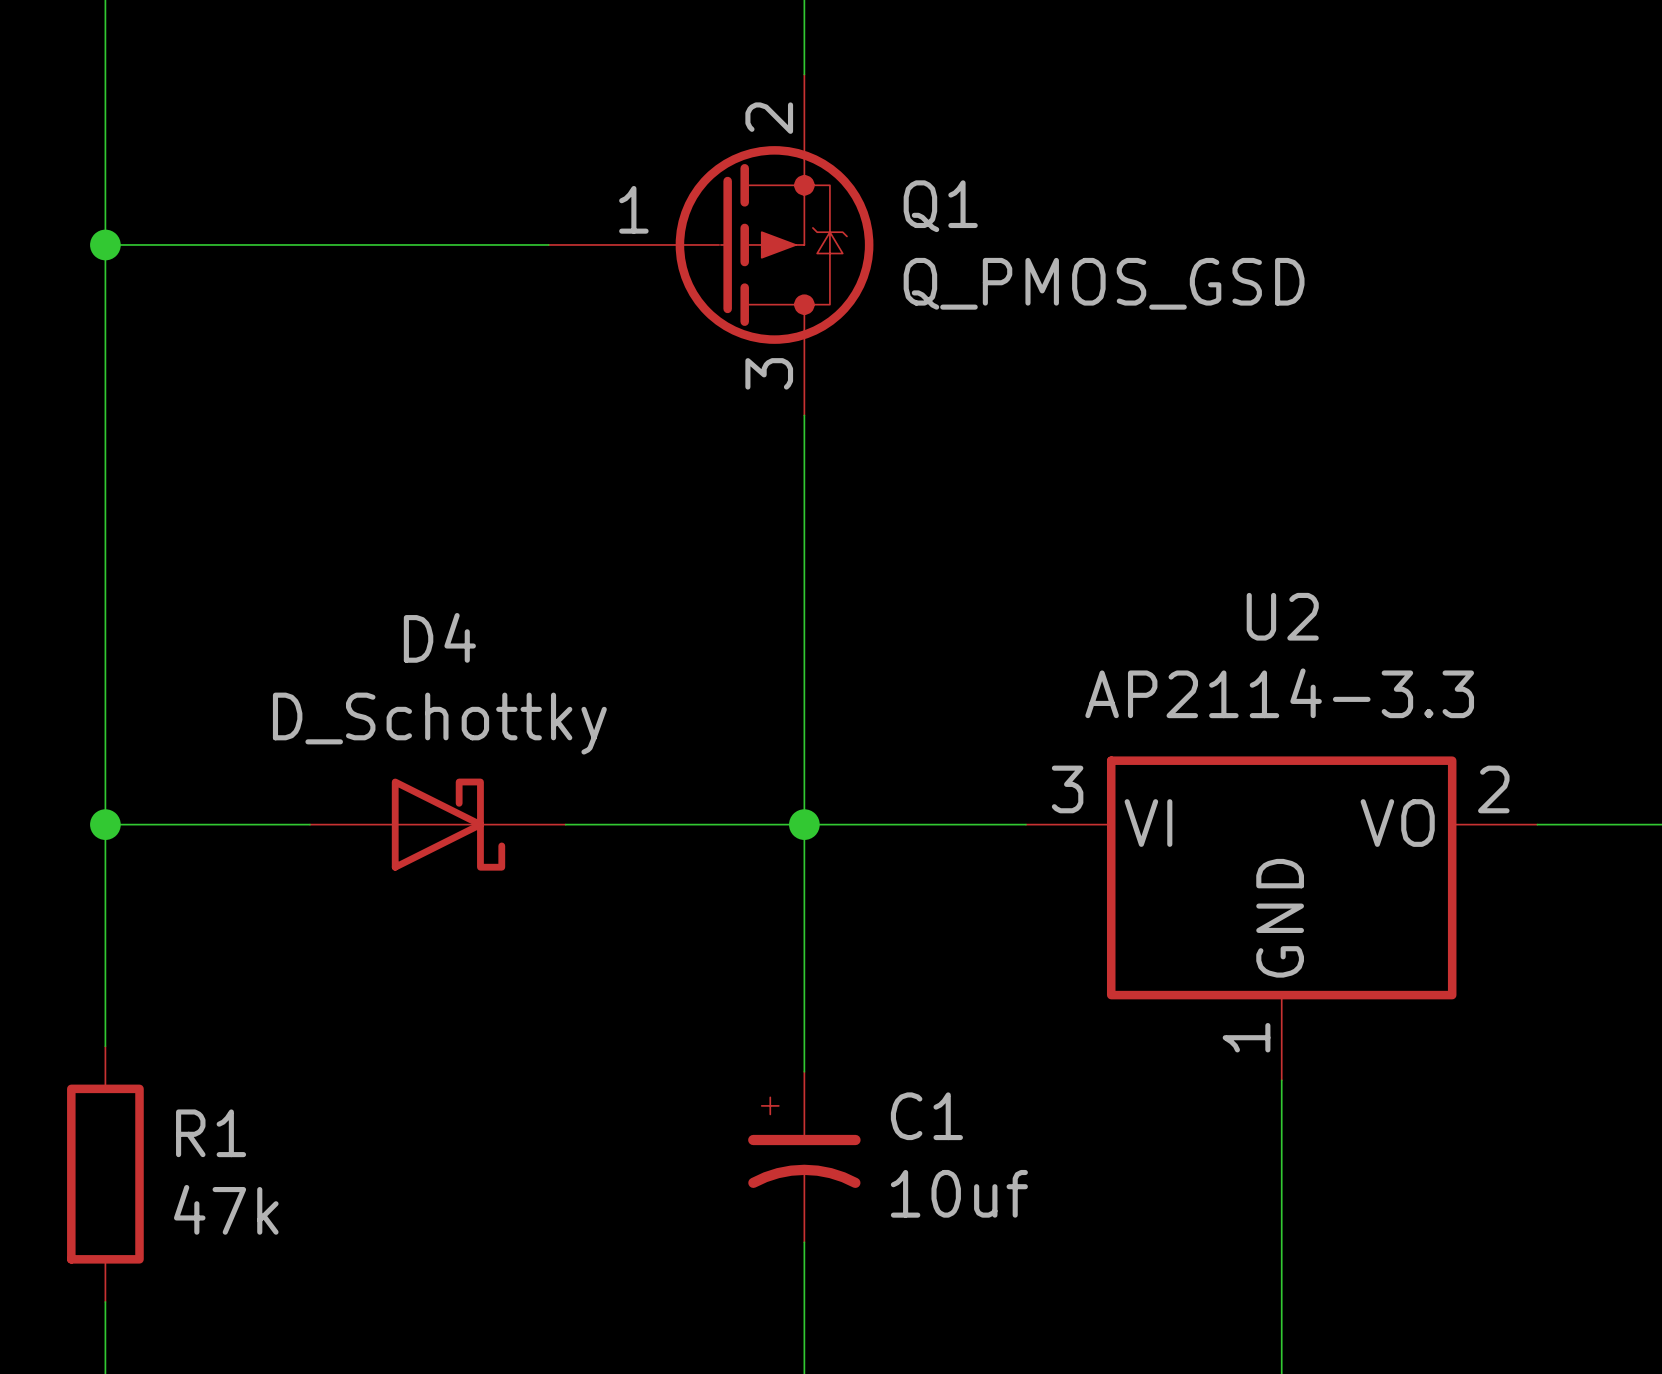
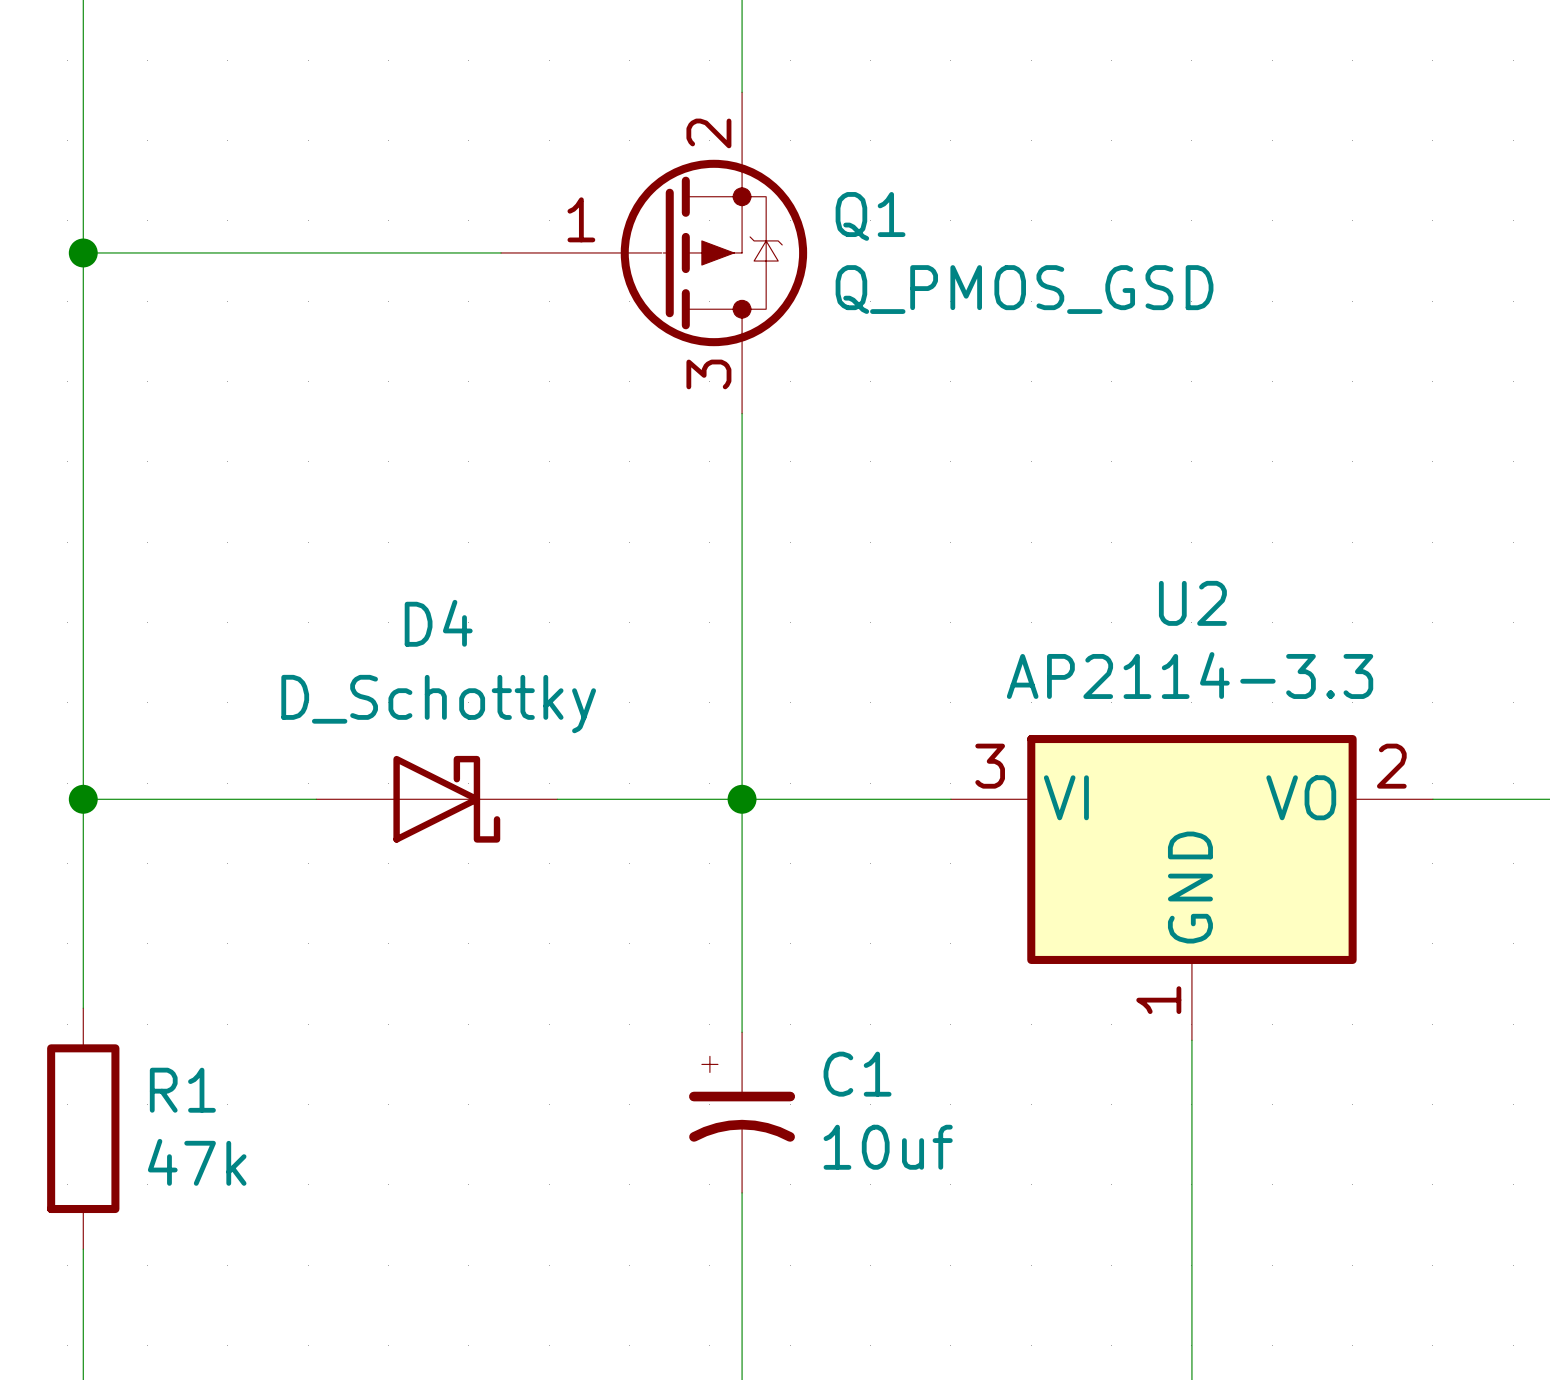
D4 position: (437, 824) -> (436, 799)

